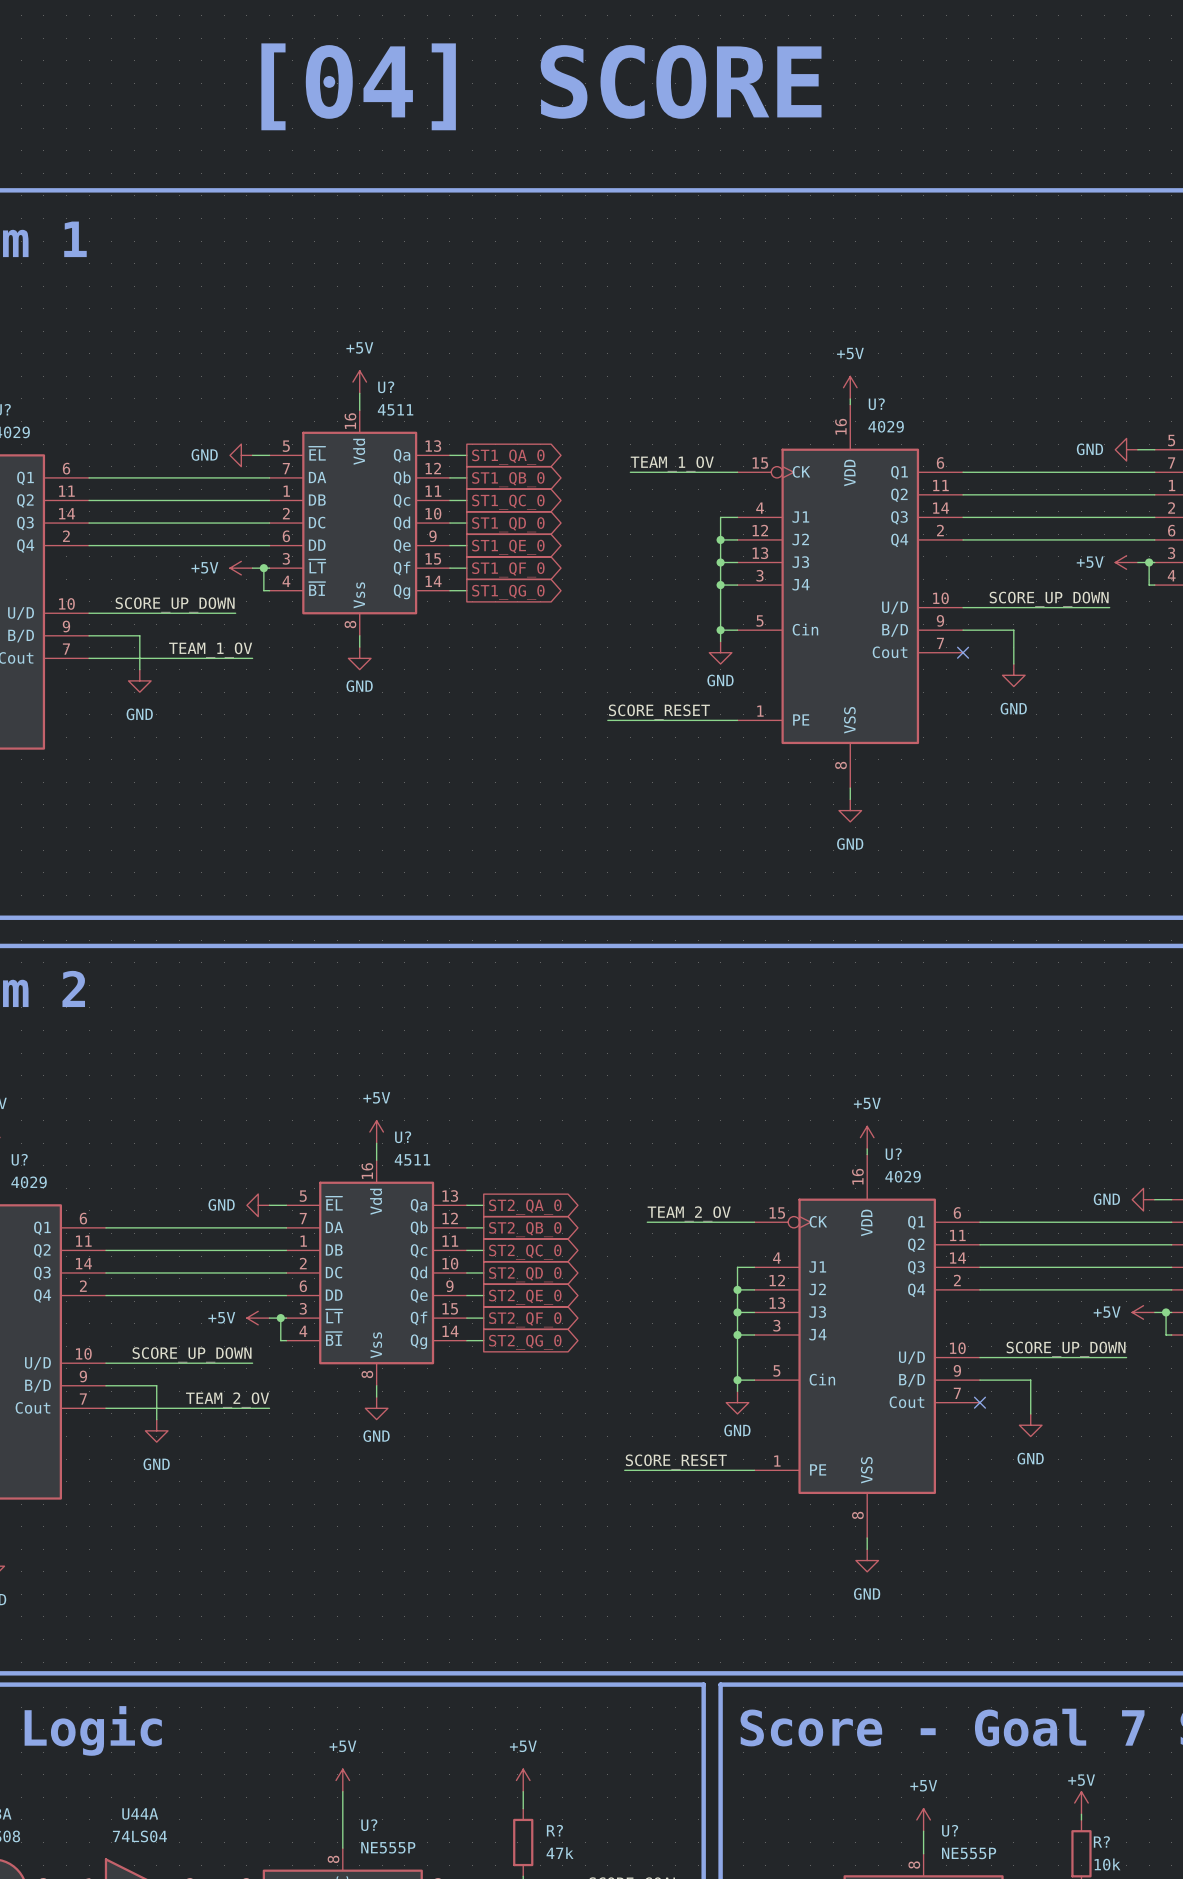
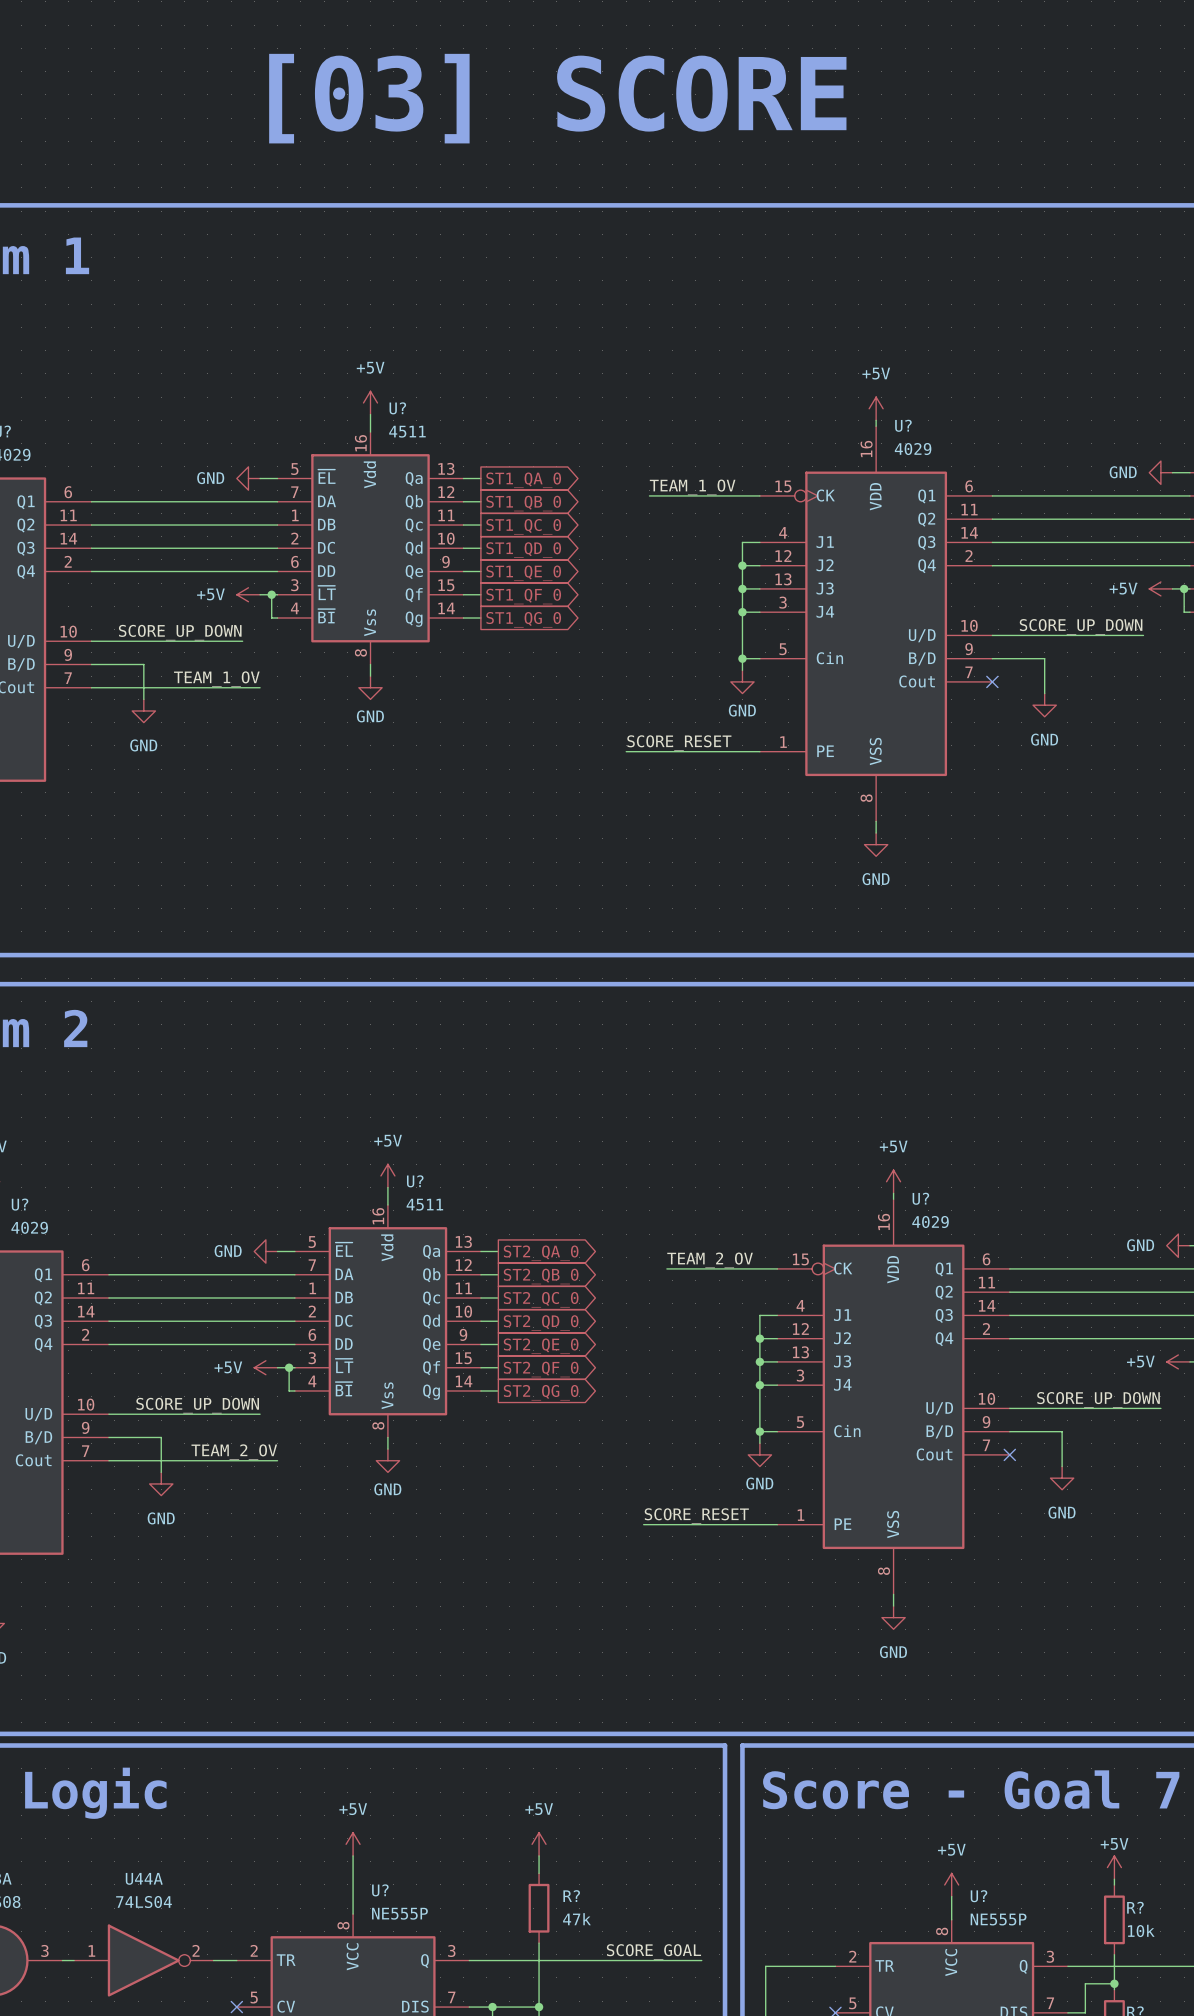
text: [04] SCORE (541, 86) -> [03] SCORE (557, 98)

